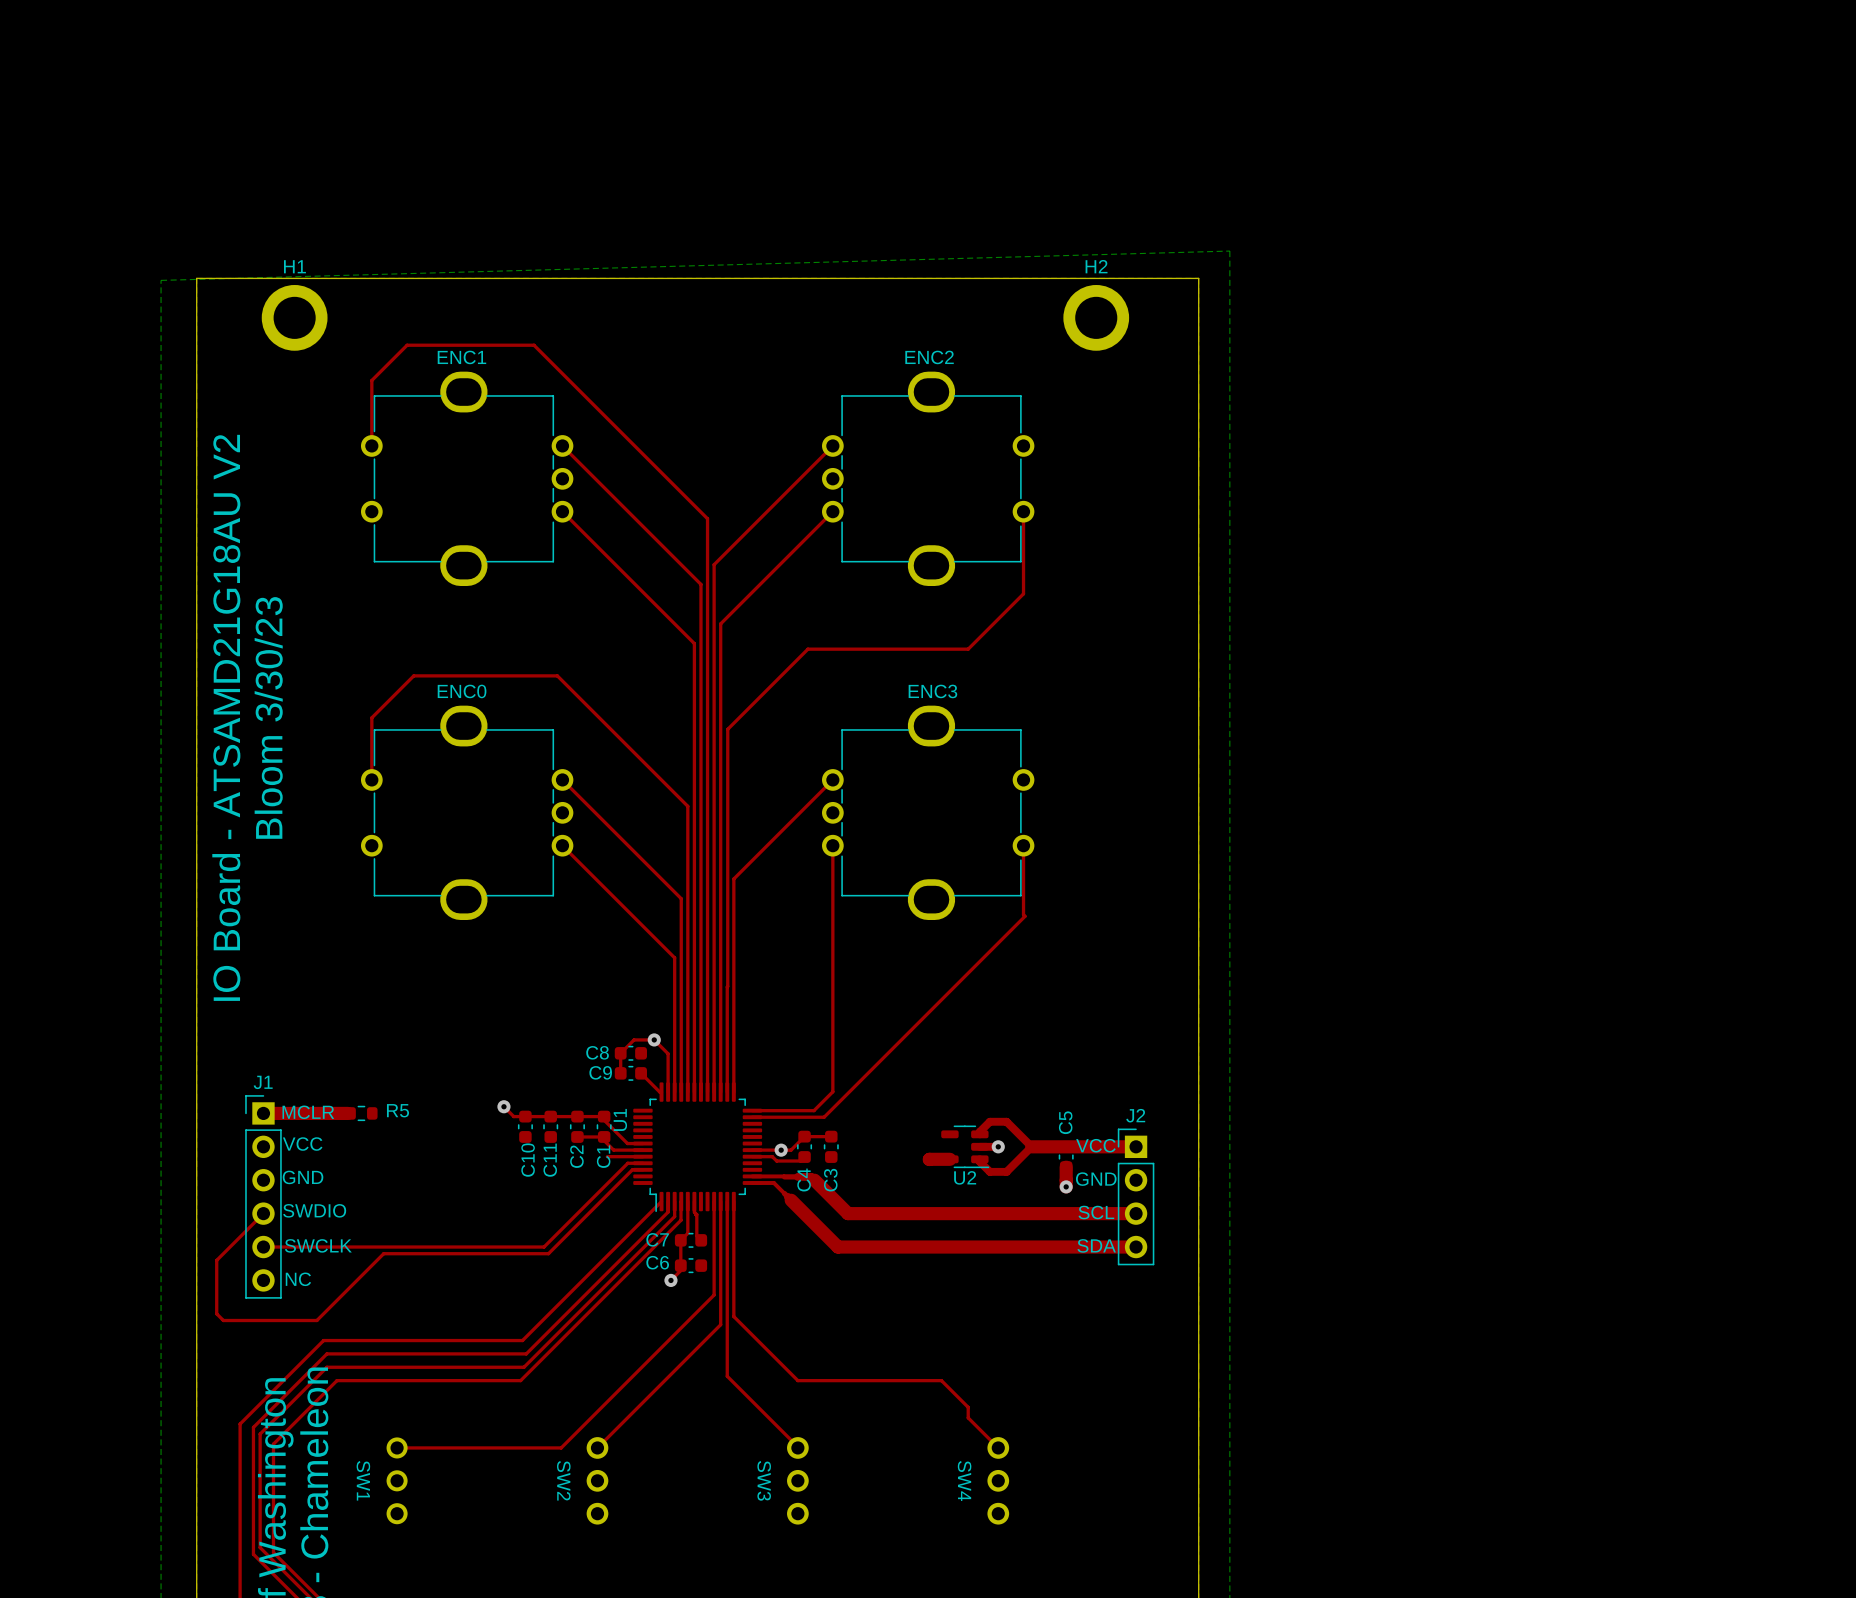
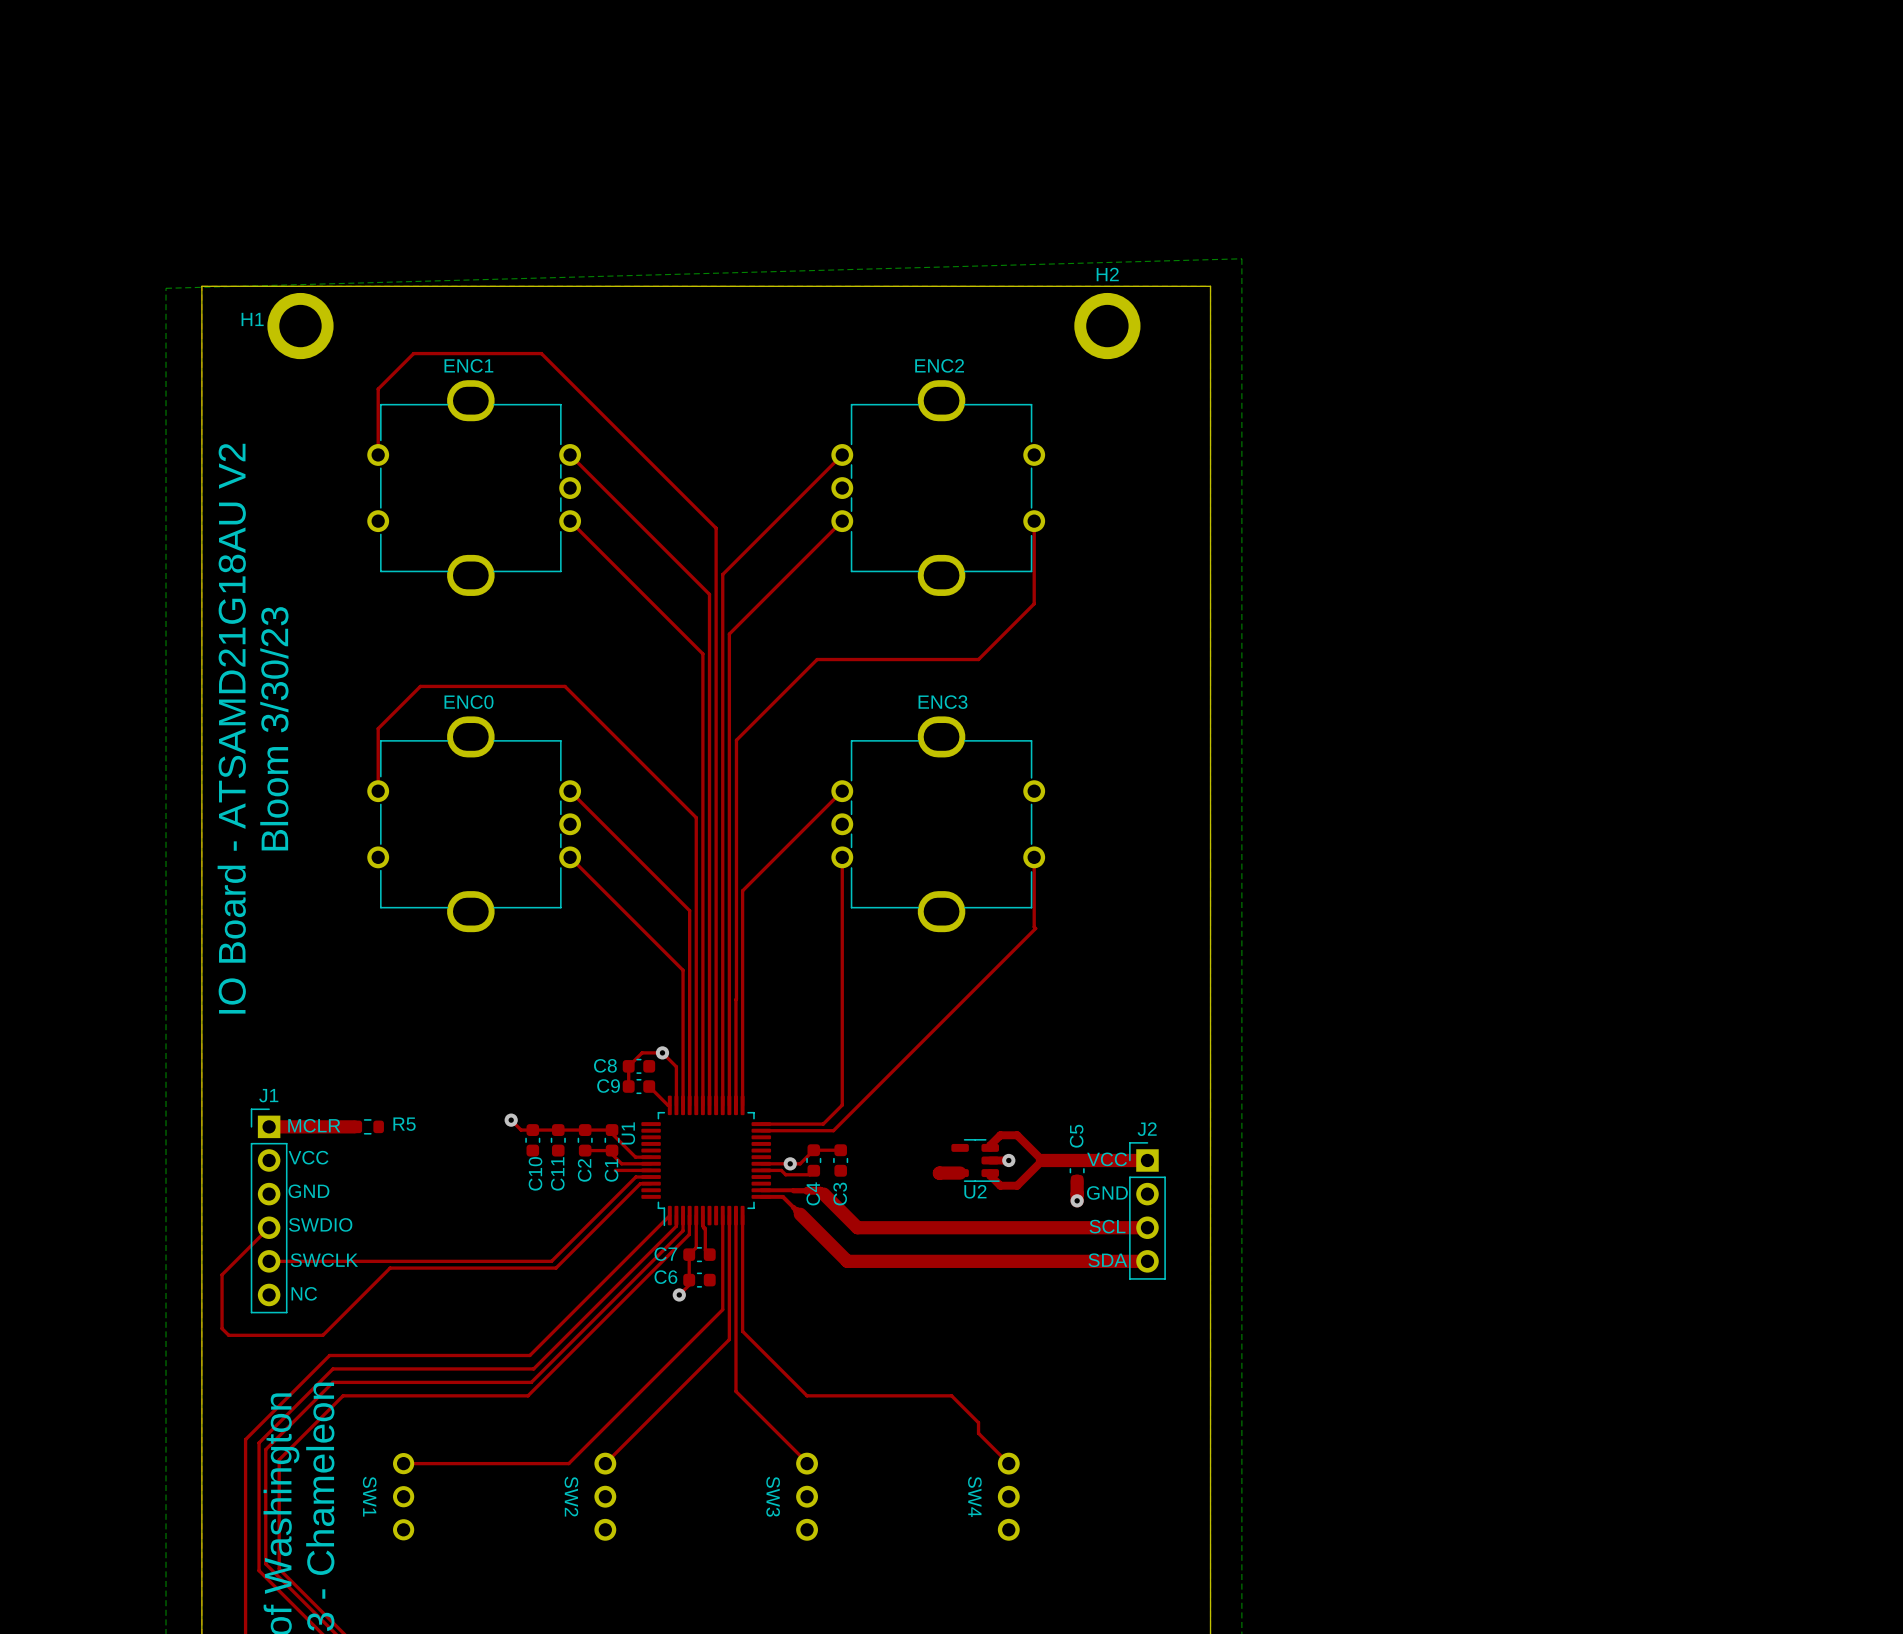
H1 name position: H1 (294, 266) -> H1 (252, 319)

